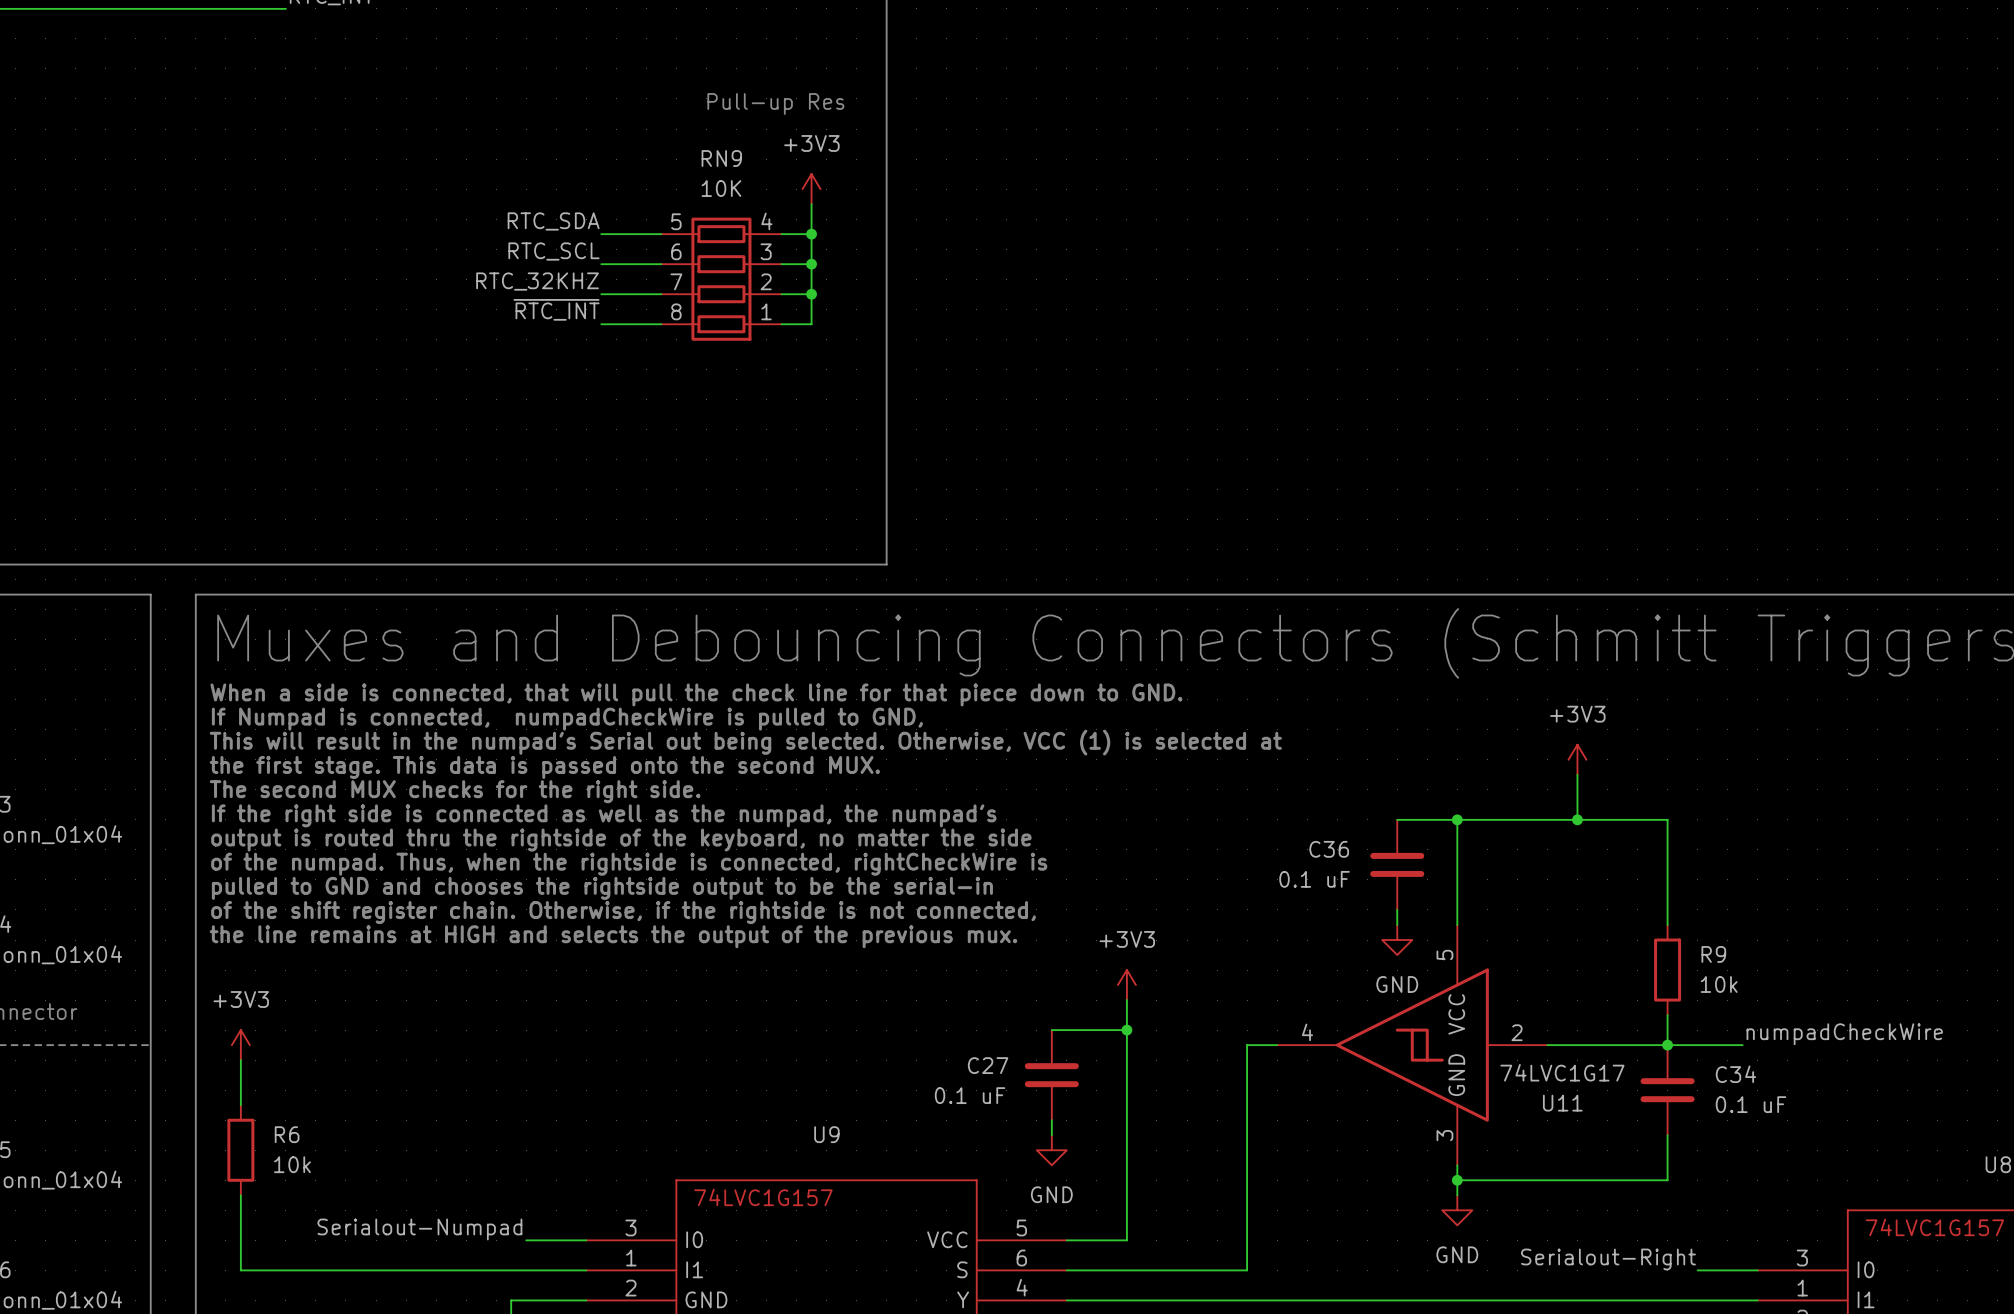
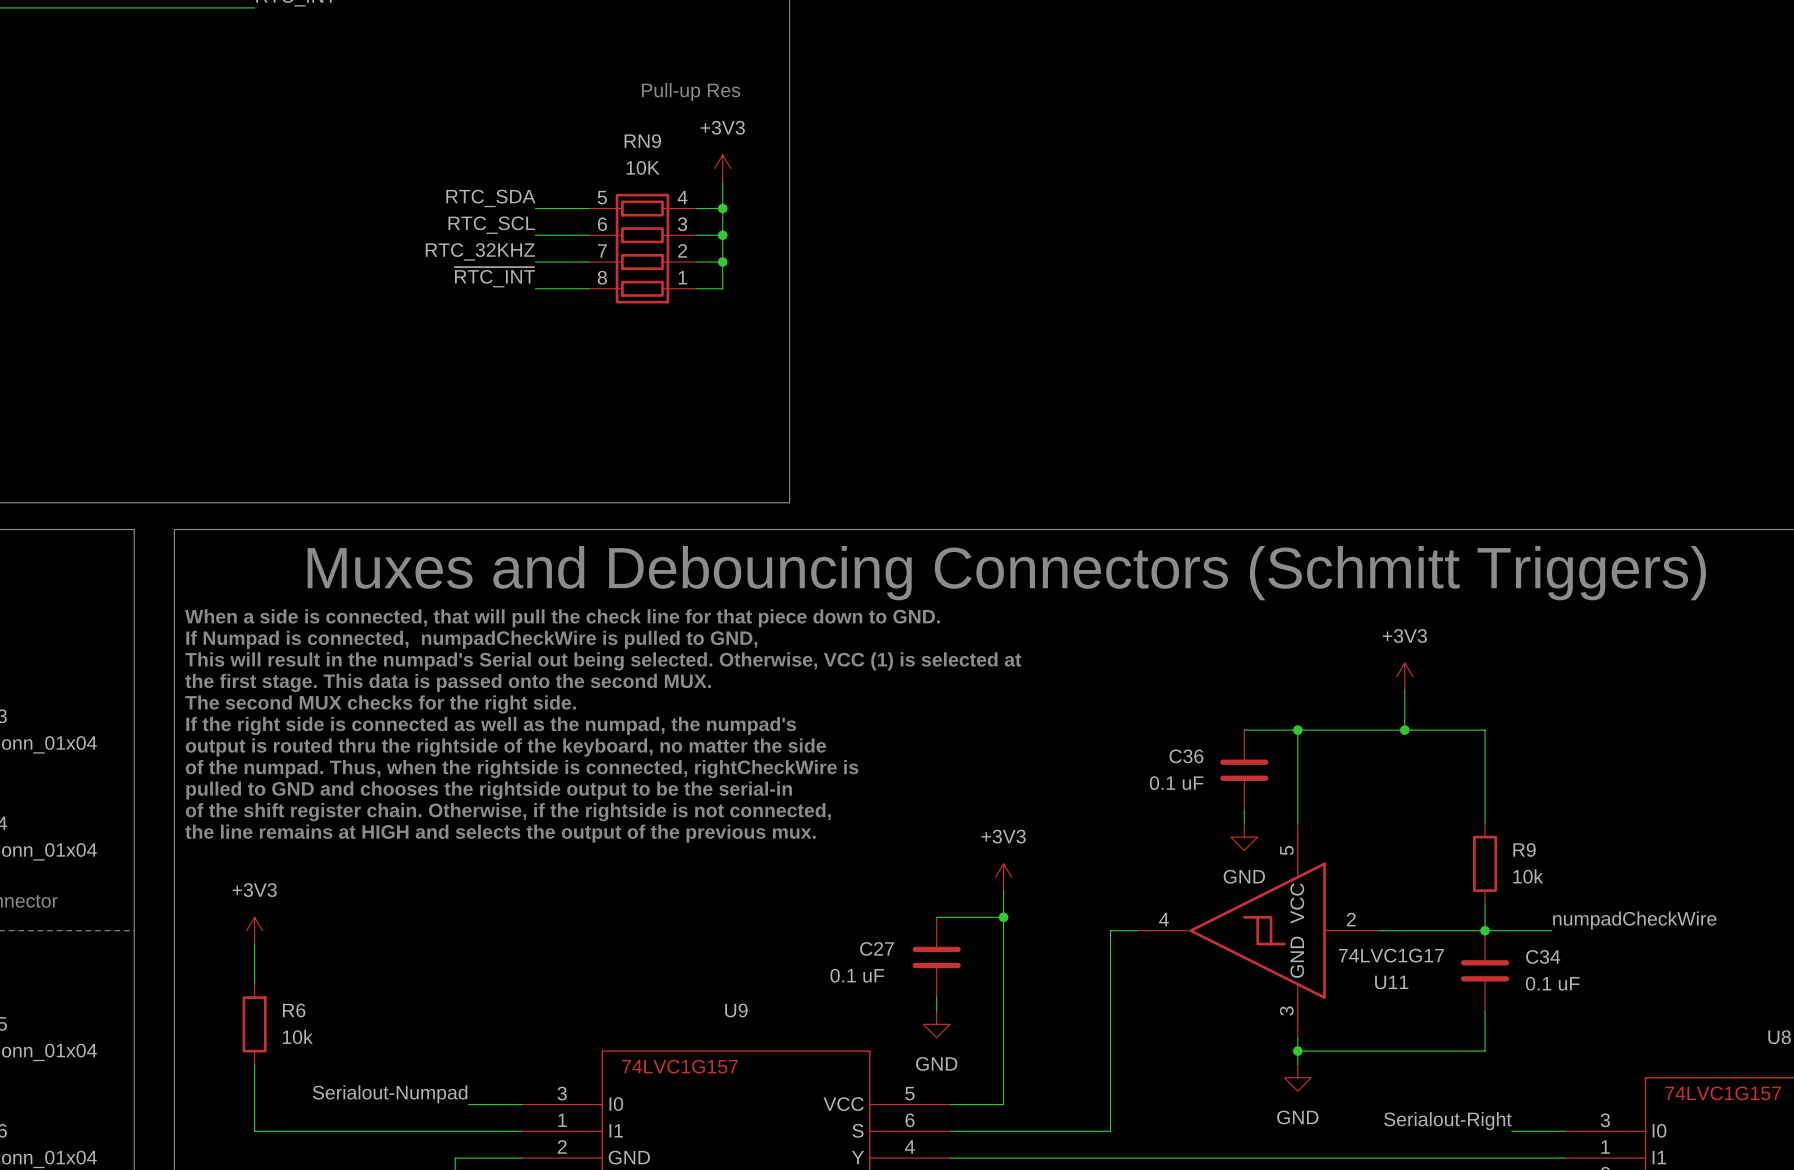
power symbol position: +3V3 (240, 1045) -> +3V3 (254, 930)
wire: (240, 1060) (240, 1105) -> (254, 944) (254, 984)
R6 position: (240, 1150) -> (254, 1024)
wire: (240, 1195) (240, 1270) (285, 1270) -> (254, 1064) (254, 1131)

